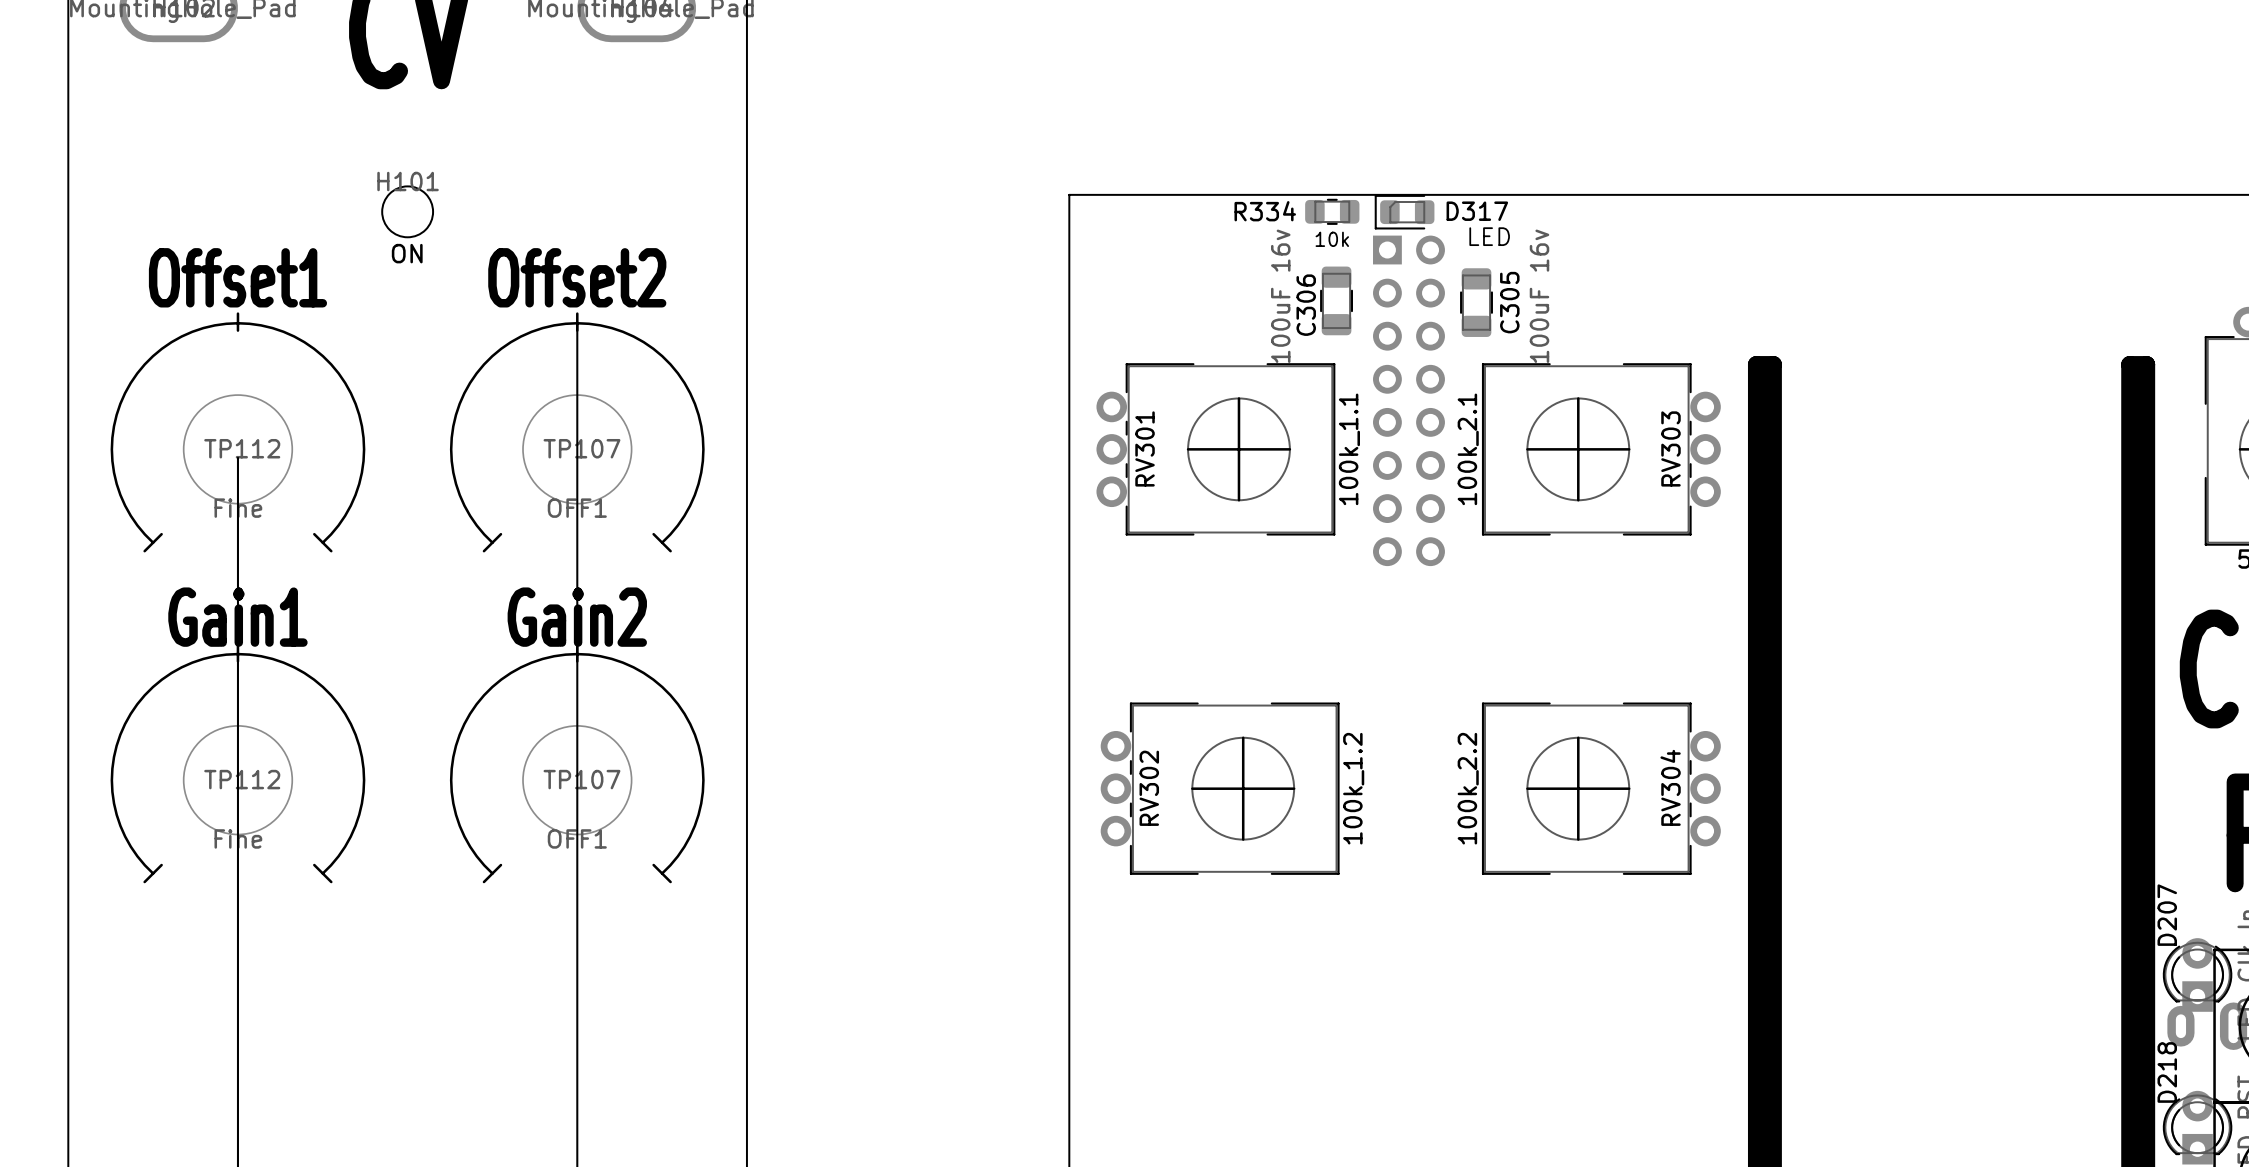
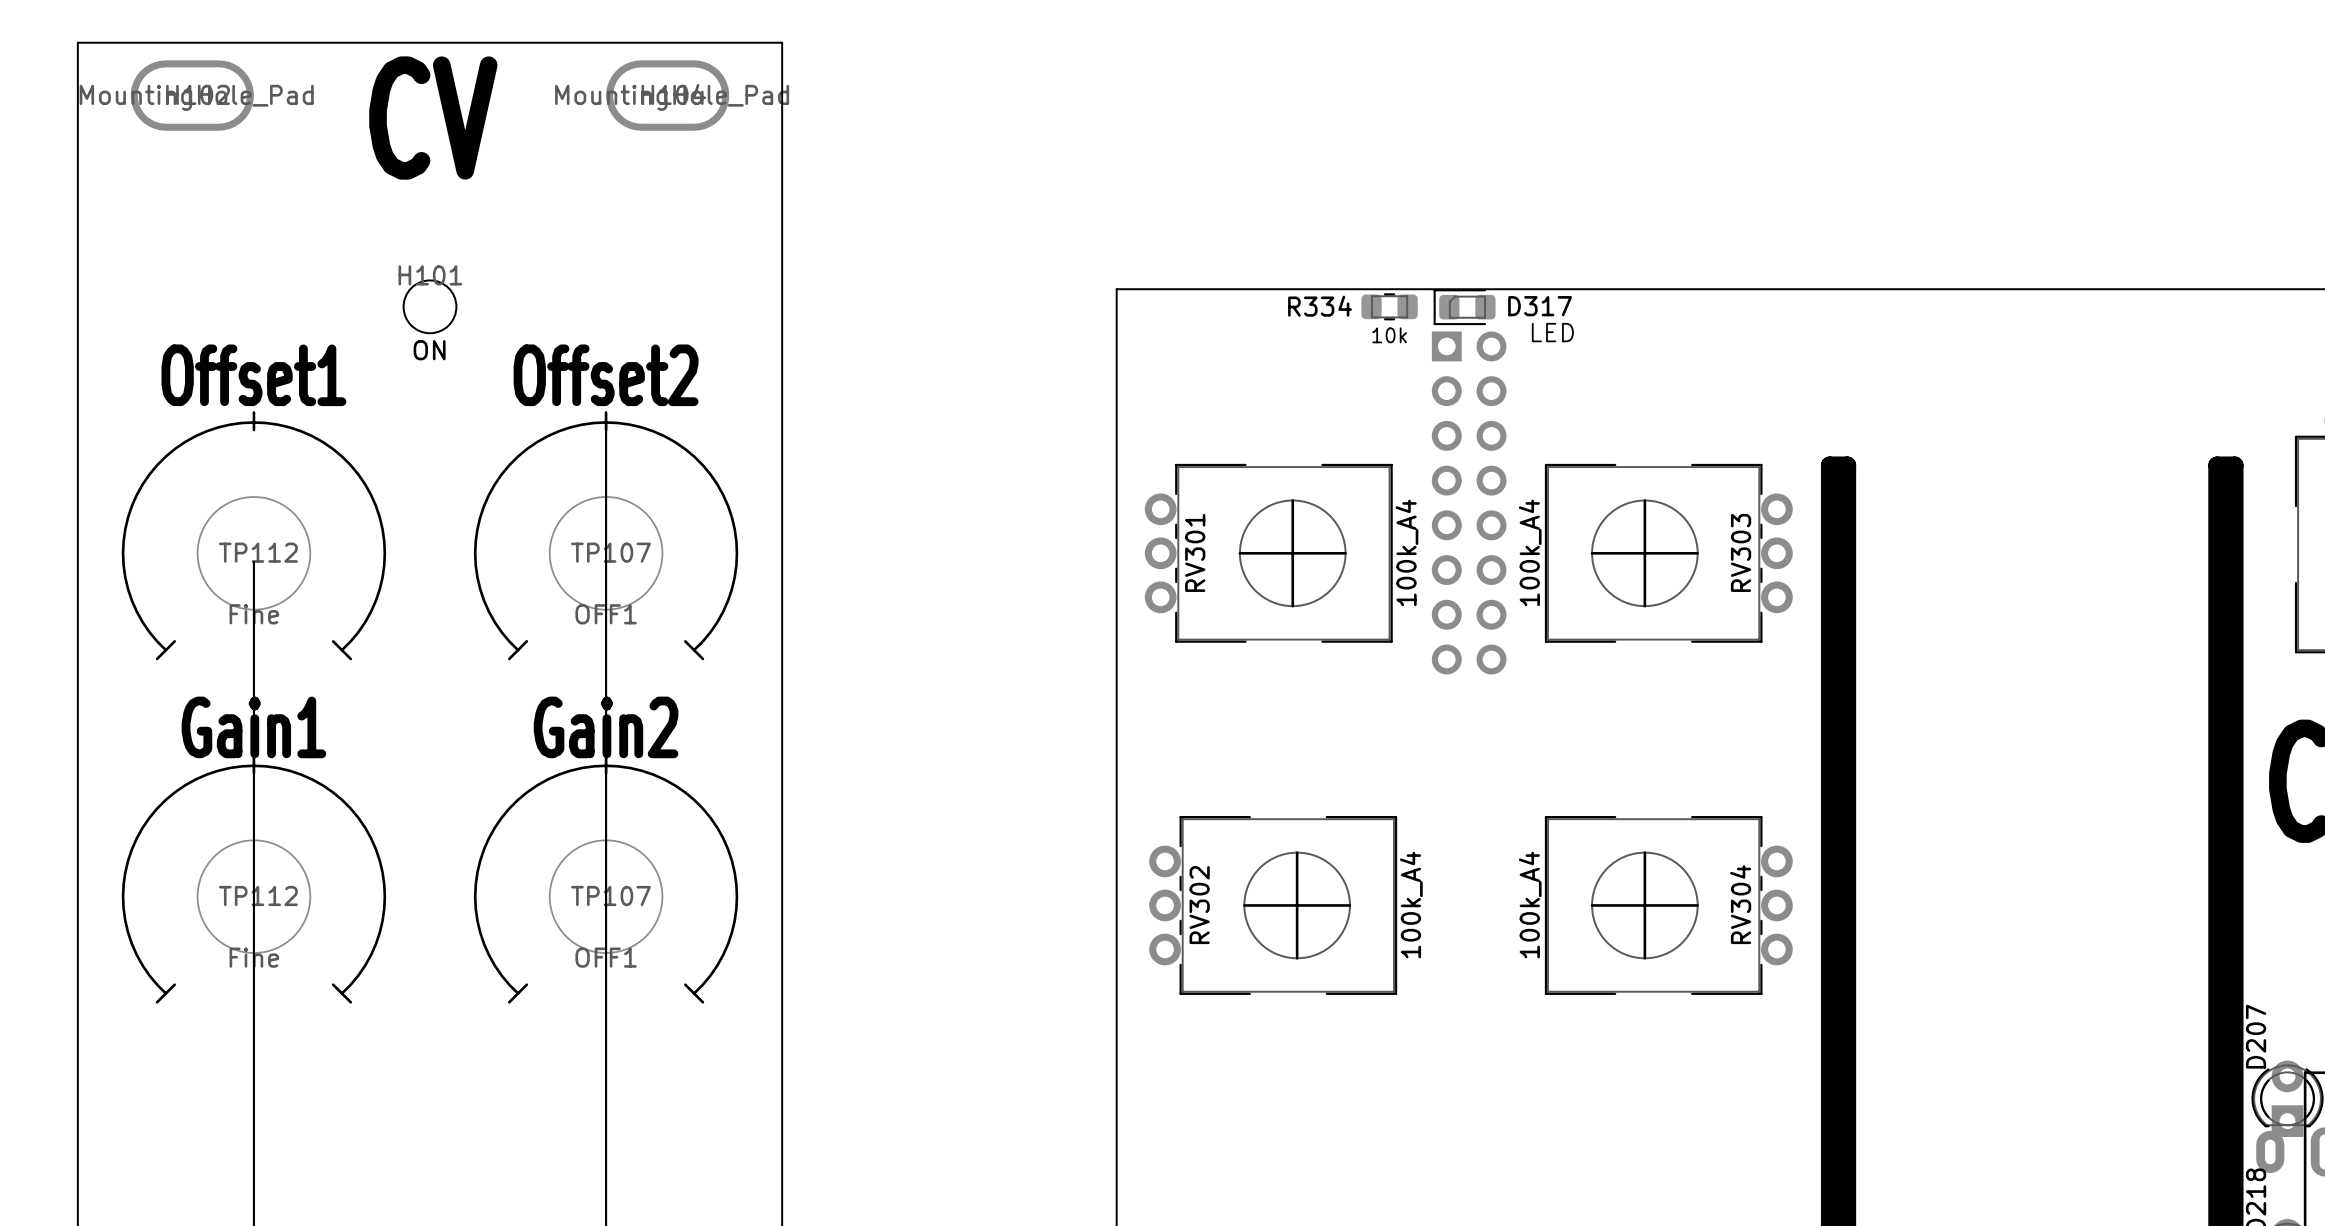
C306: 100uF 16v (1336, 300) -> none
C305: 100uF 16v (1476, 302) -> none
RV301 value: 100k_1.1 (1349, 449) -> 100k_A4 (1406, 552)
RV303 value: 100k_2.1 (1468, 449) -> 100k_A4 (1530, 552)
RV302 value: 100k_1.2 (1353, 788) -> 100k_A4 (1411, 905)
RV304 value: 100k_2.2 (1468, 788) -> 100k_A4 (1530, 905)

